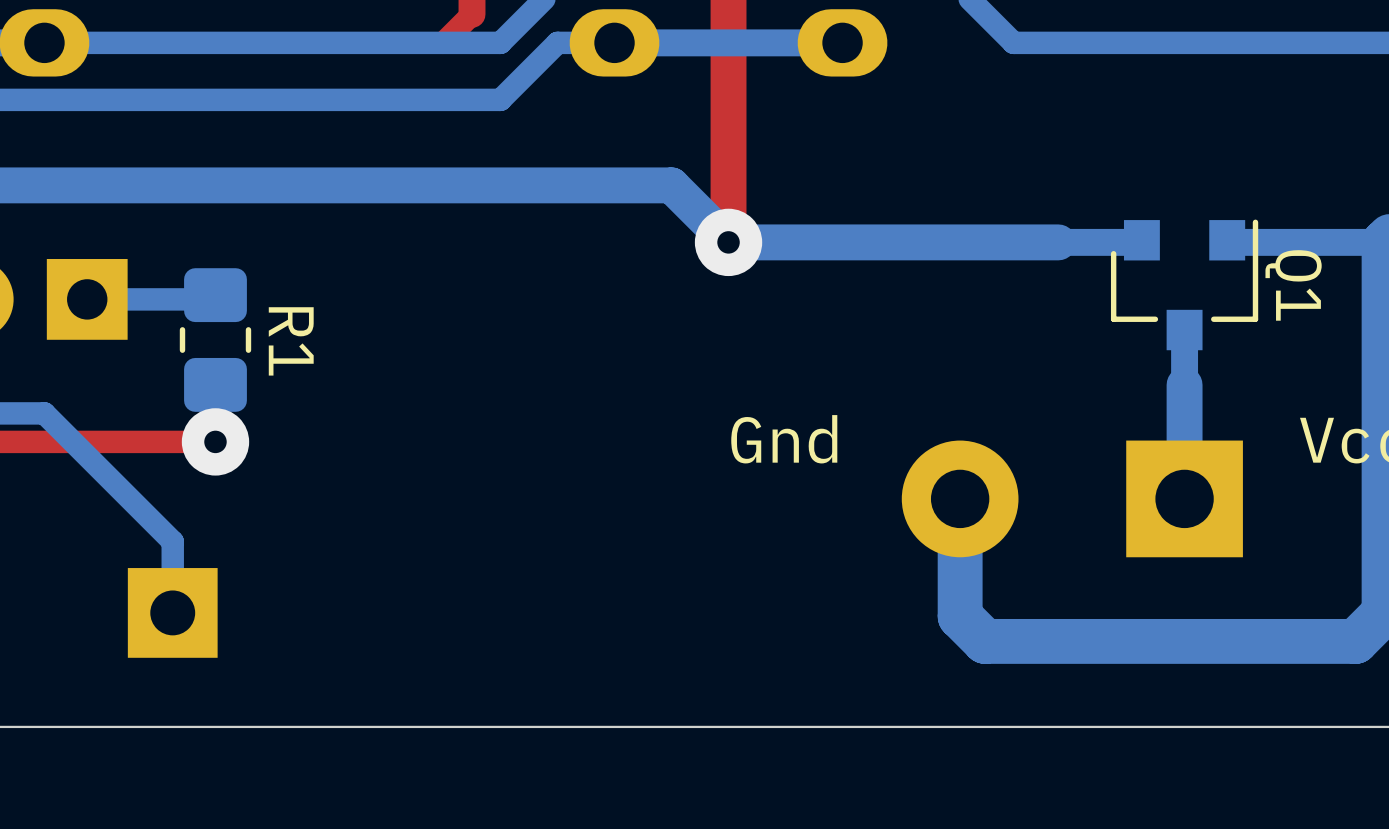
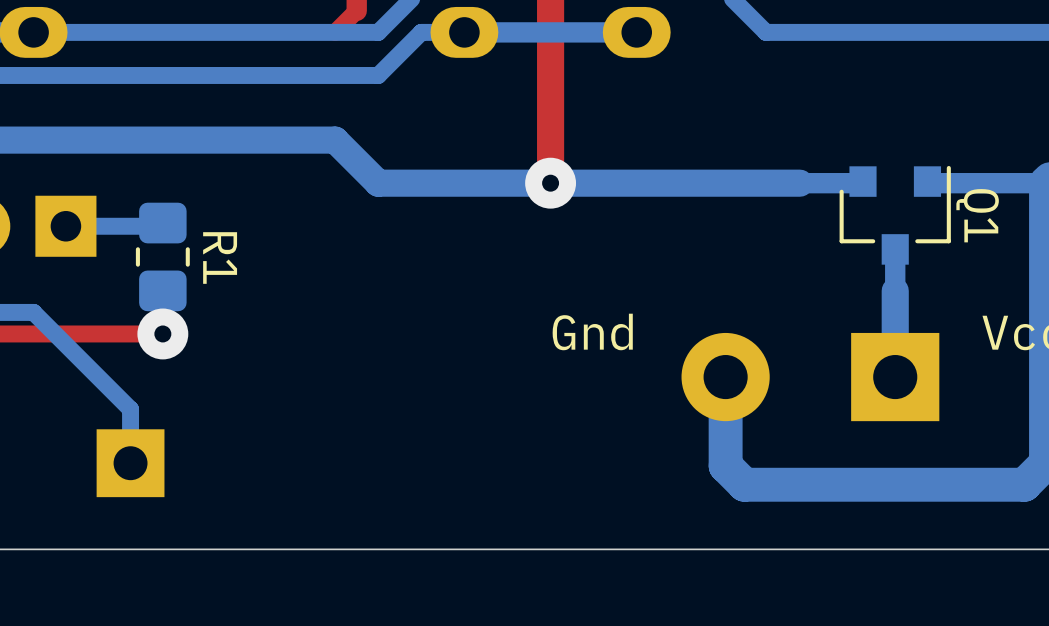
bottom track: (443, 185) (671, 185) (728, 242) -> (335, 140) (378, 183) (550, 183)

